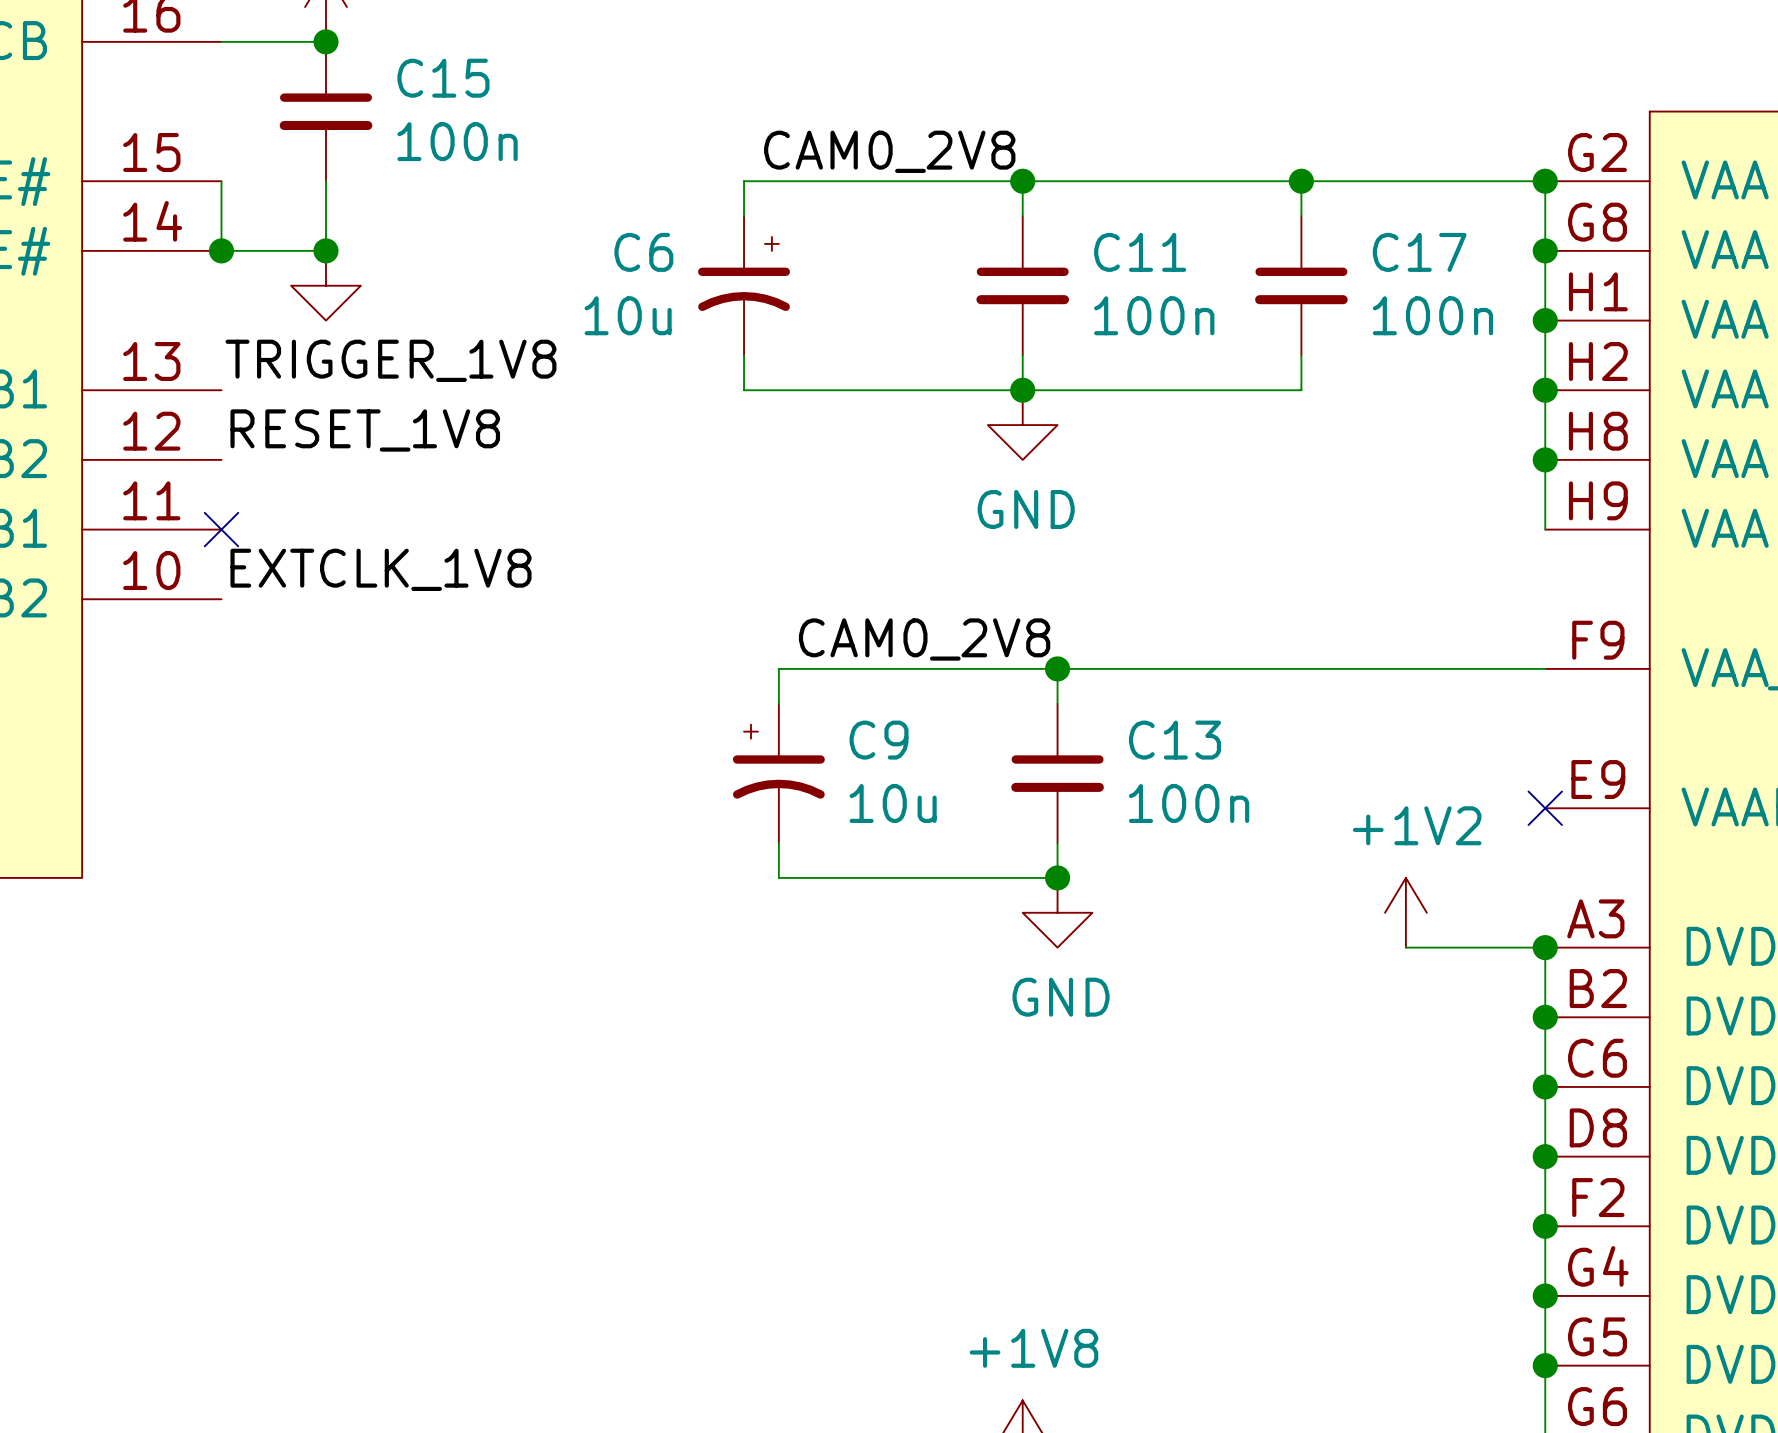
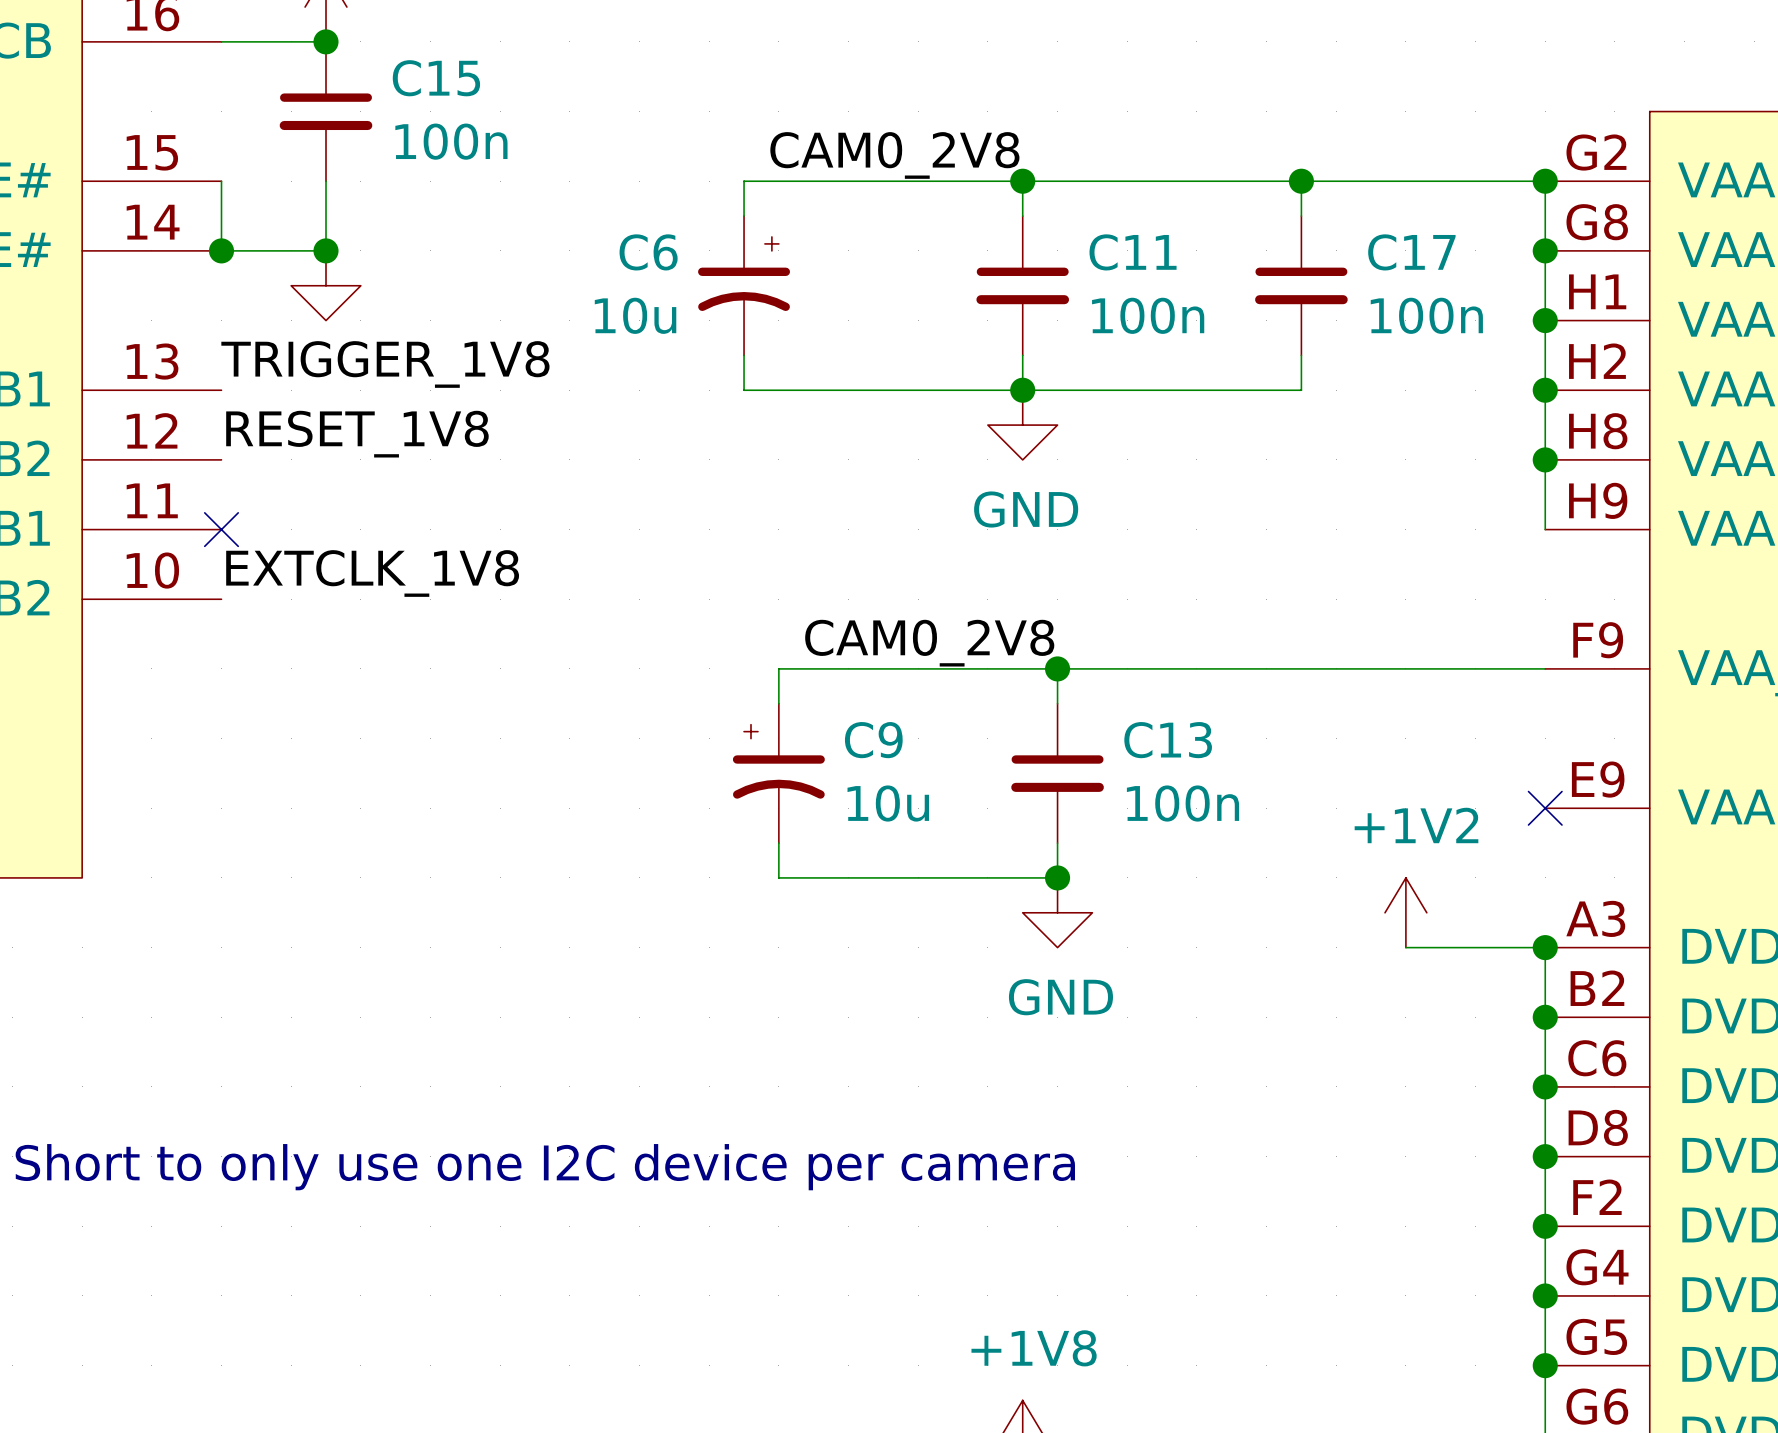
text: none -> Short to only use one I2C device per camera (545, 1167)

